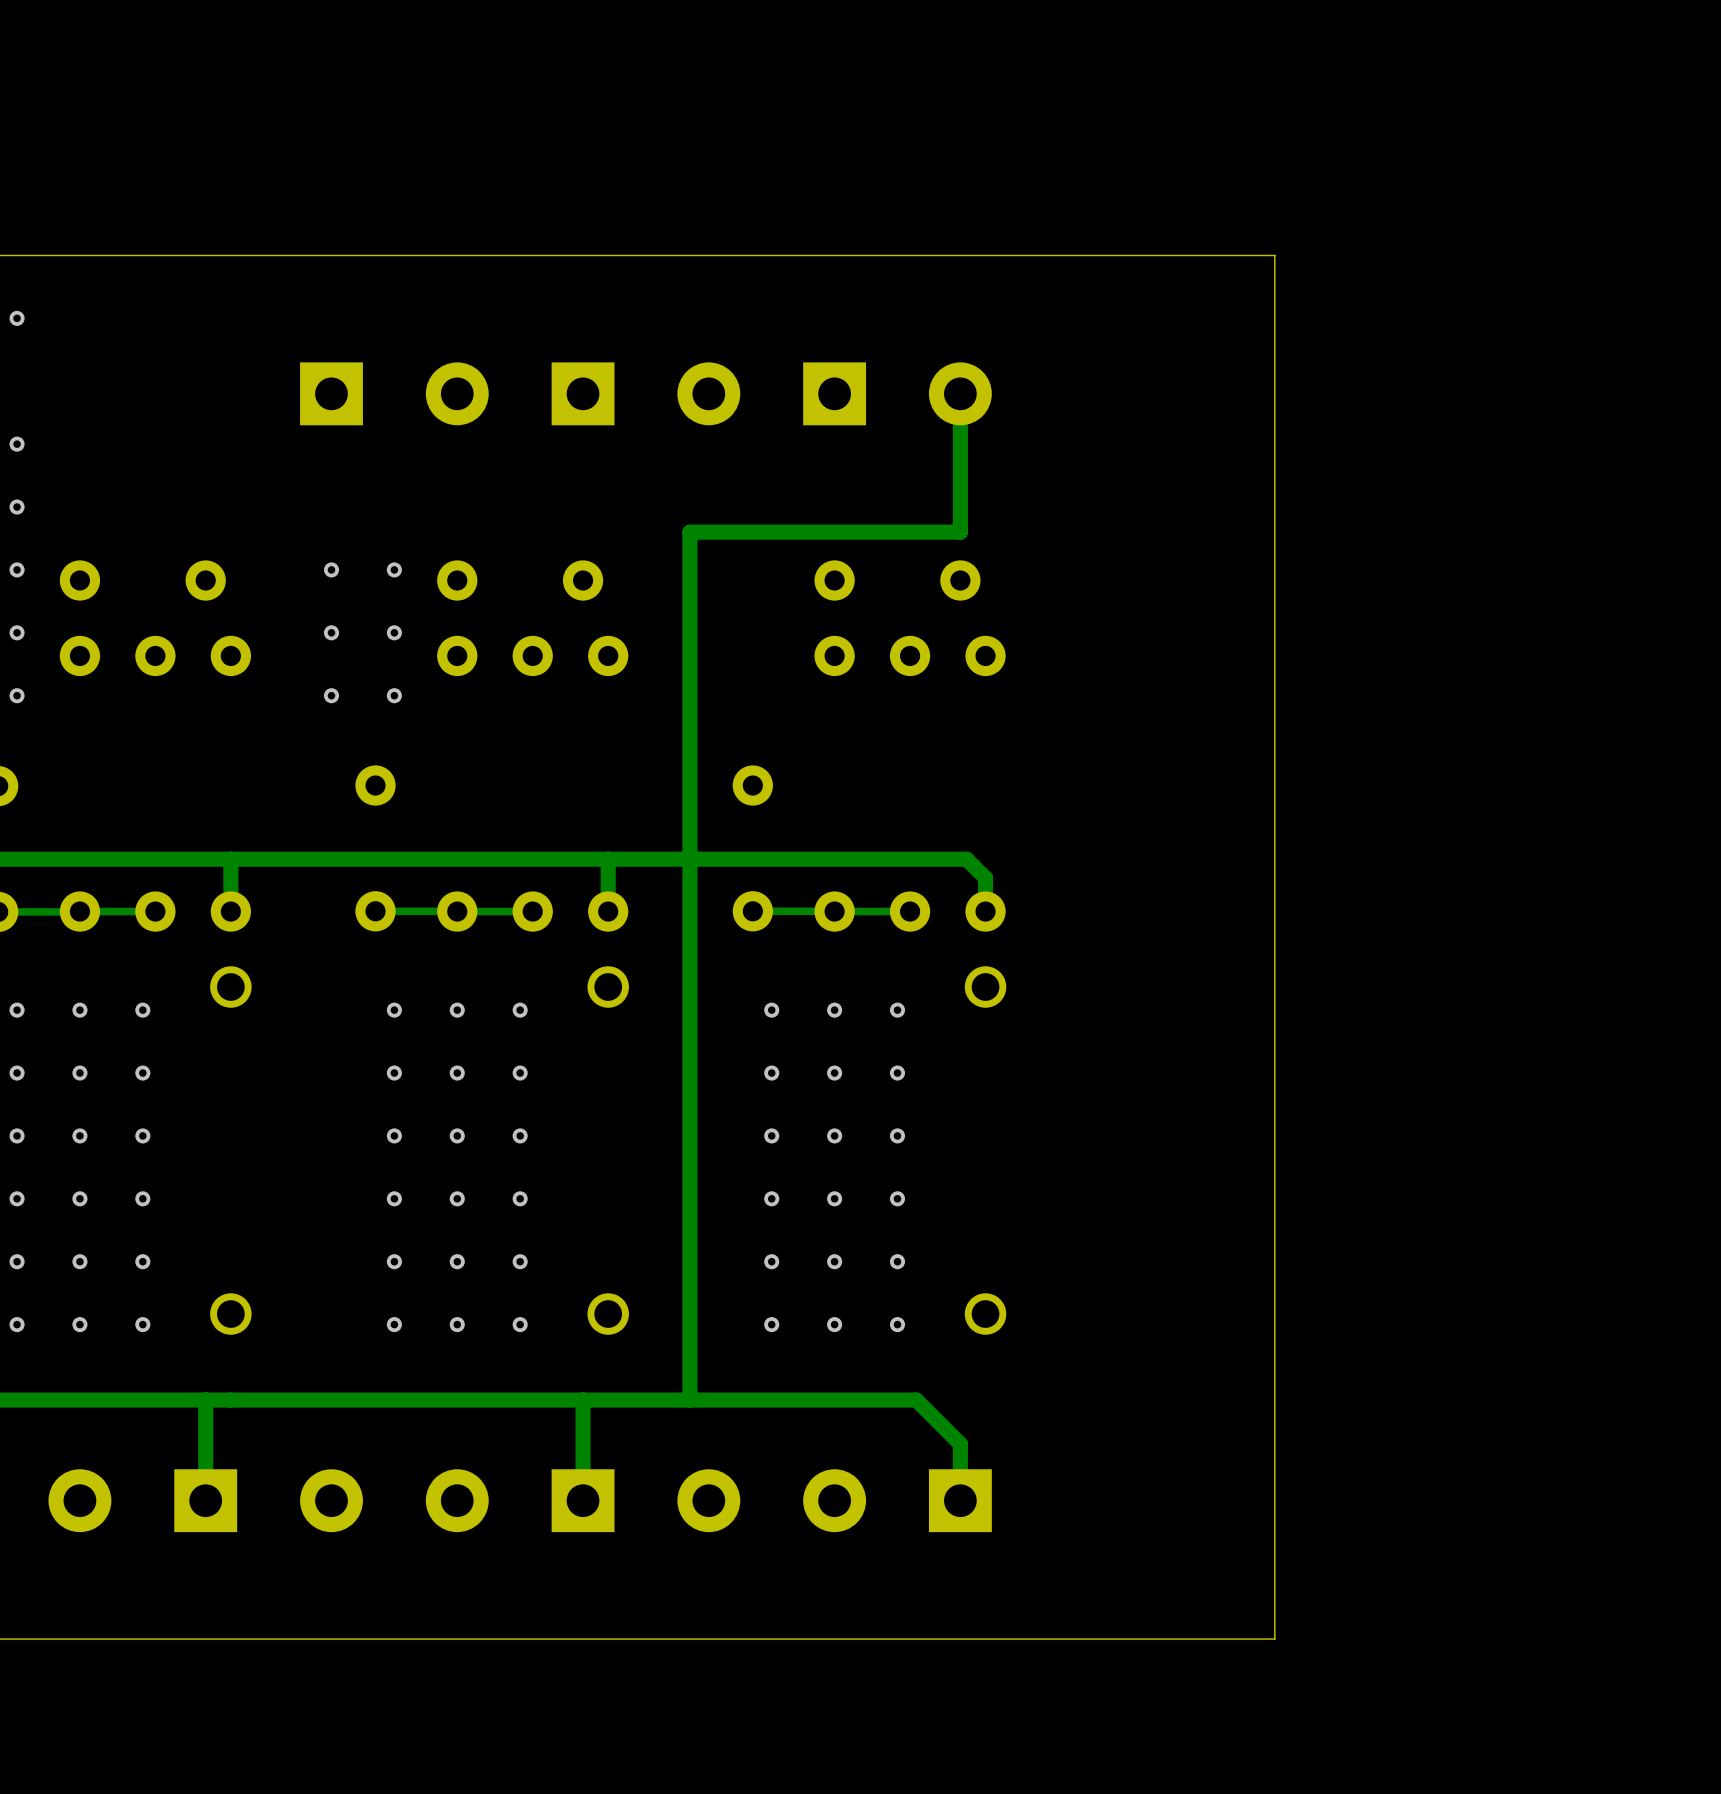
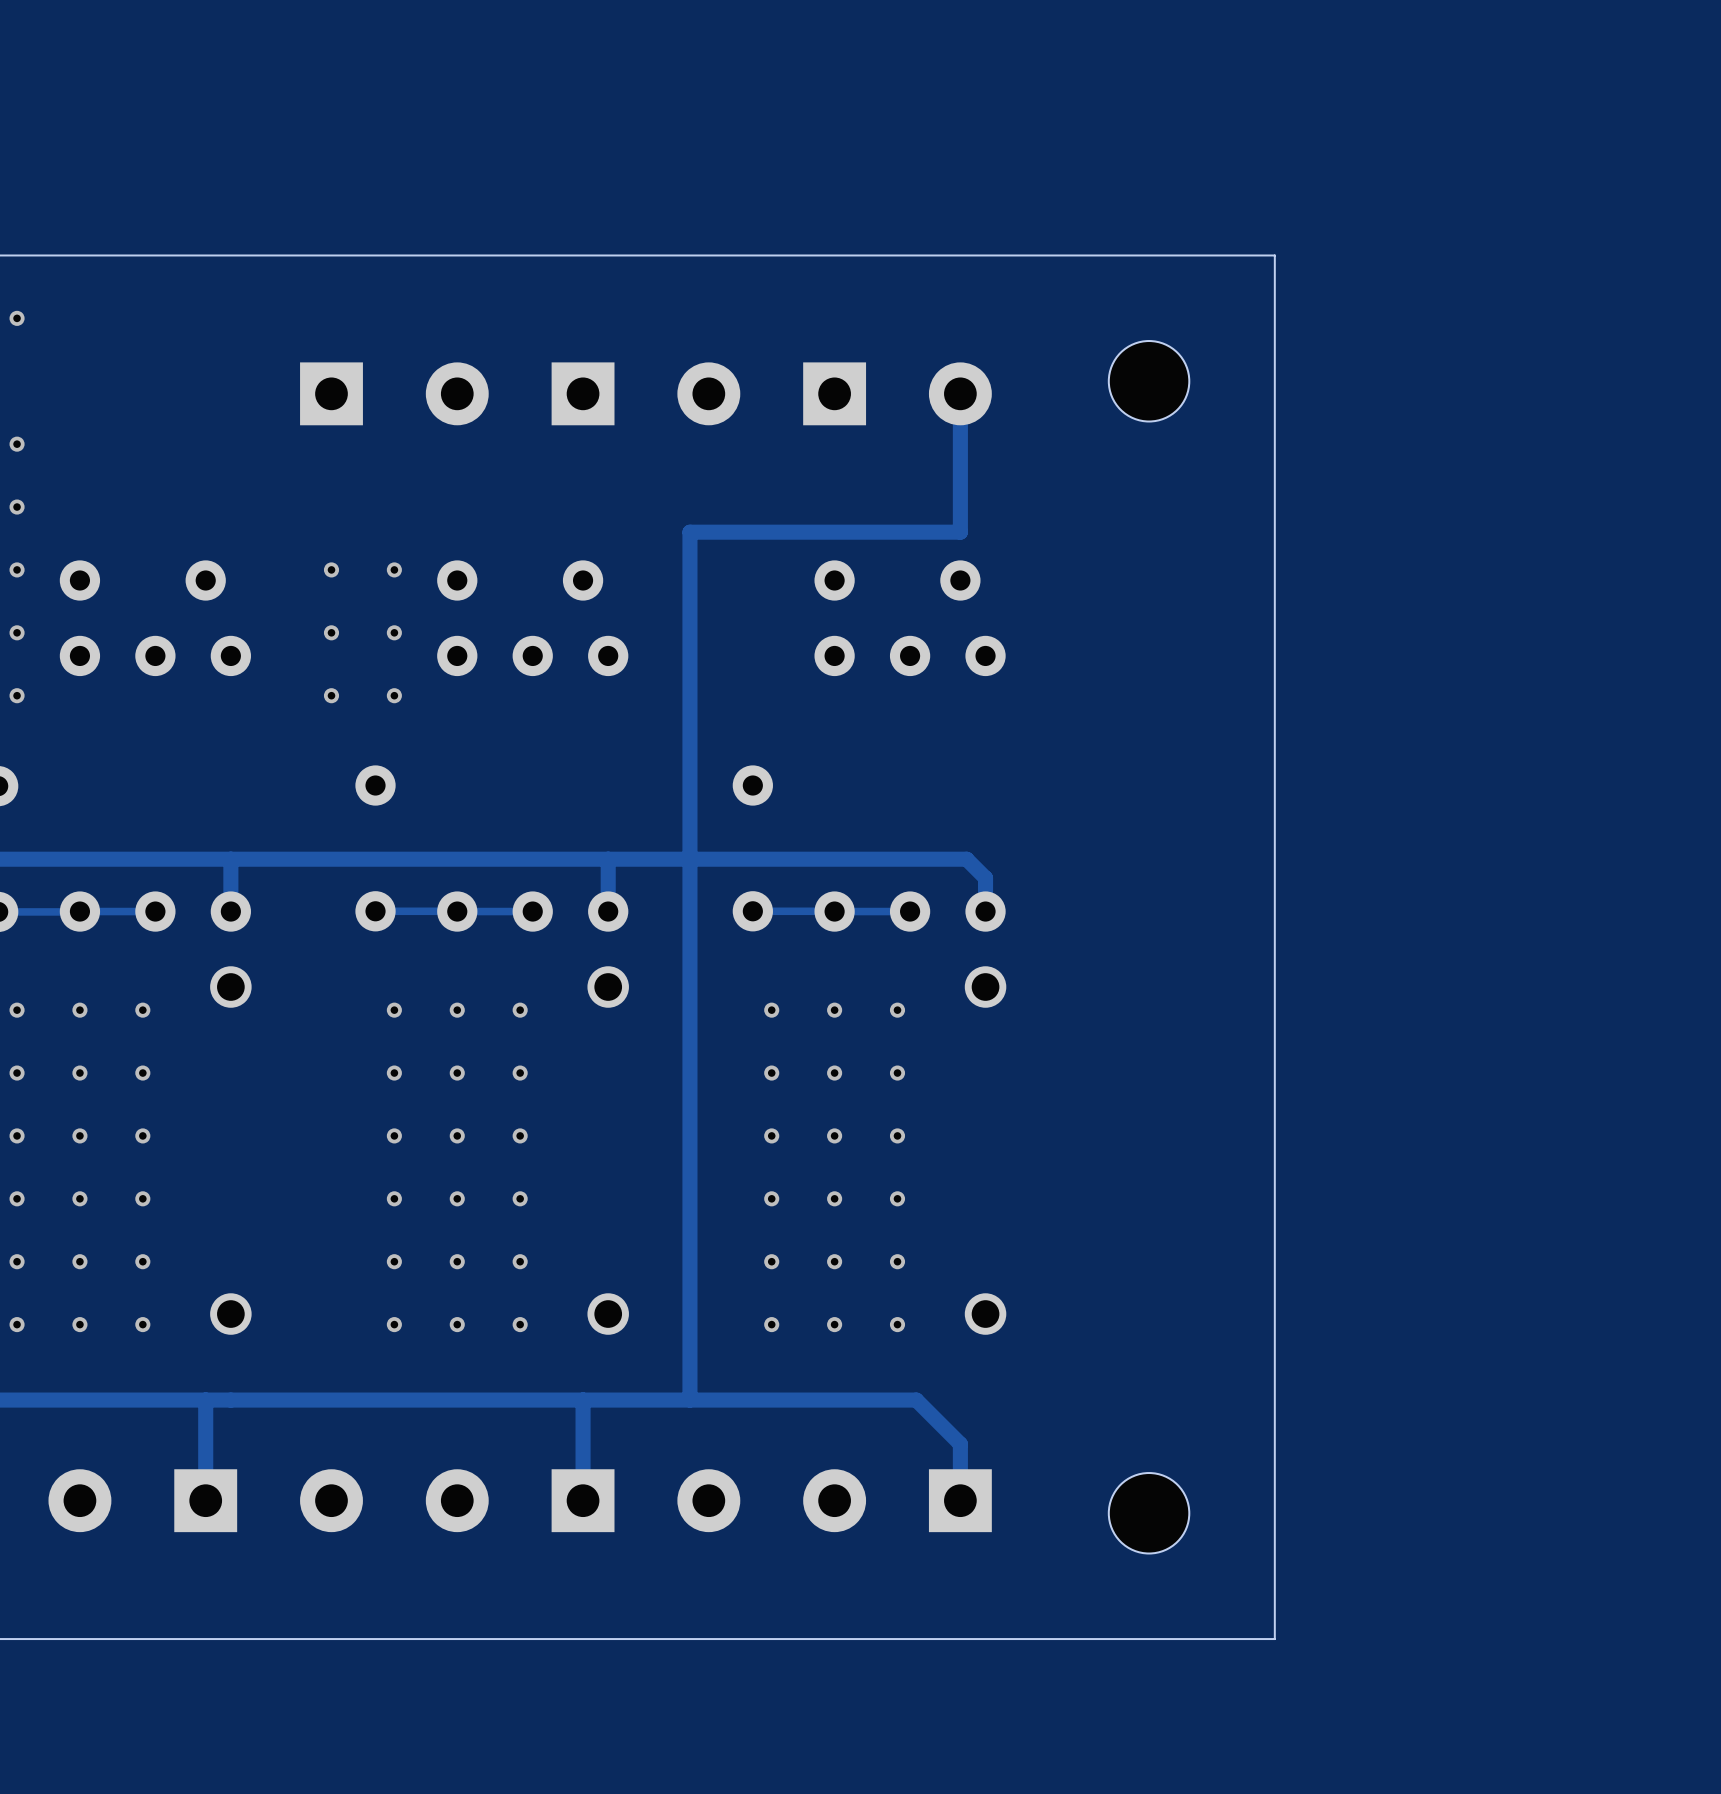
part: none -> (1149, 381)
part: none -> (1149, 1513)

